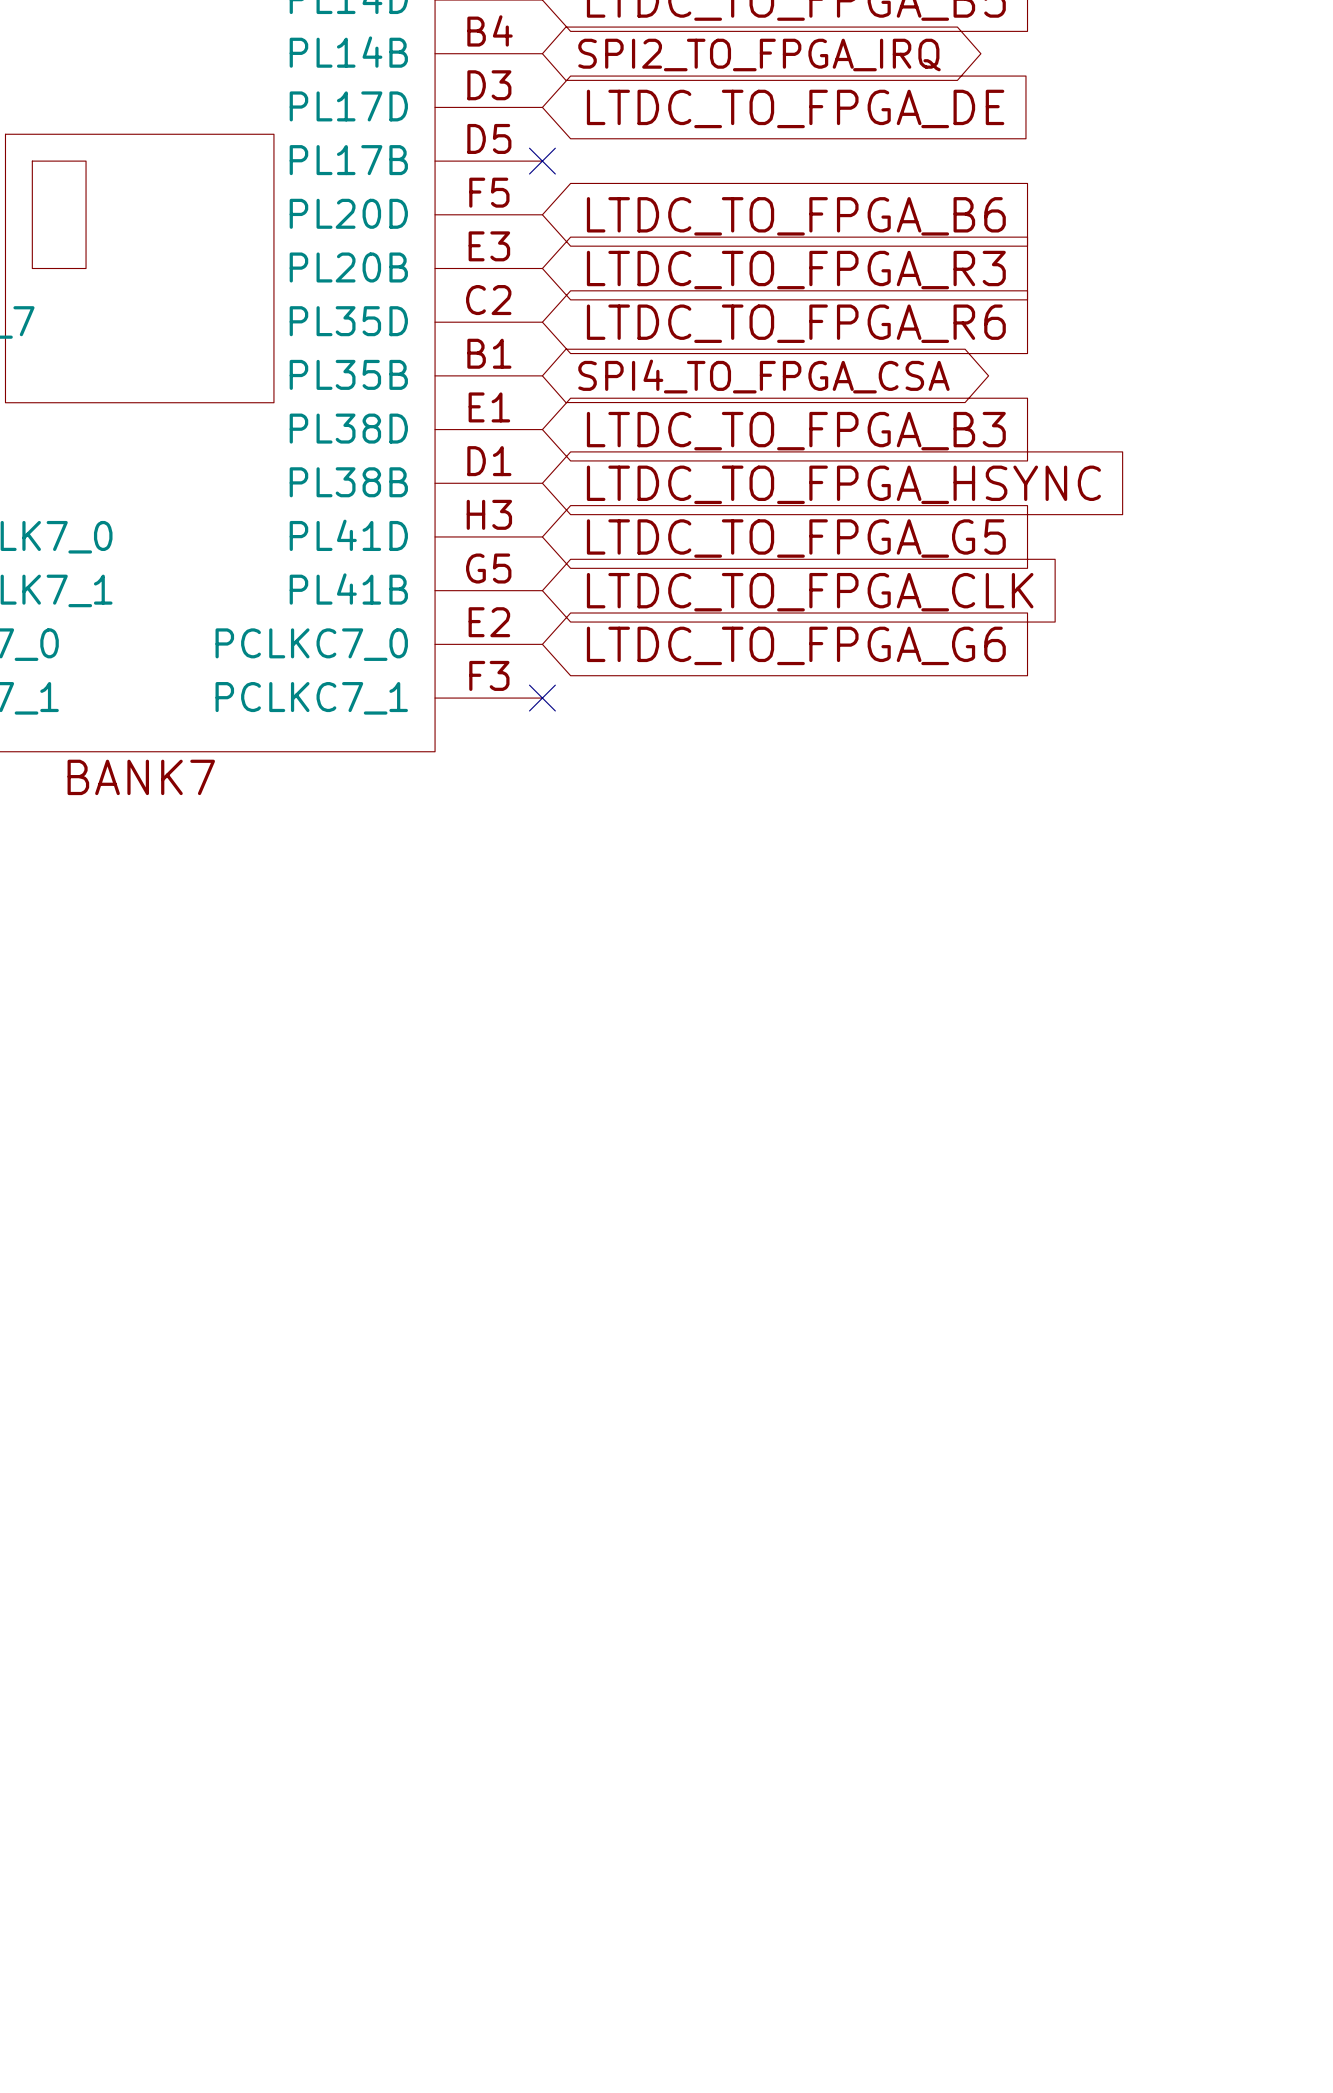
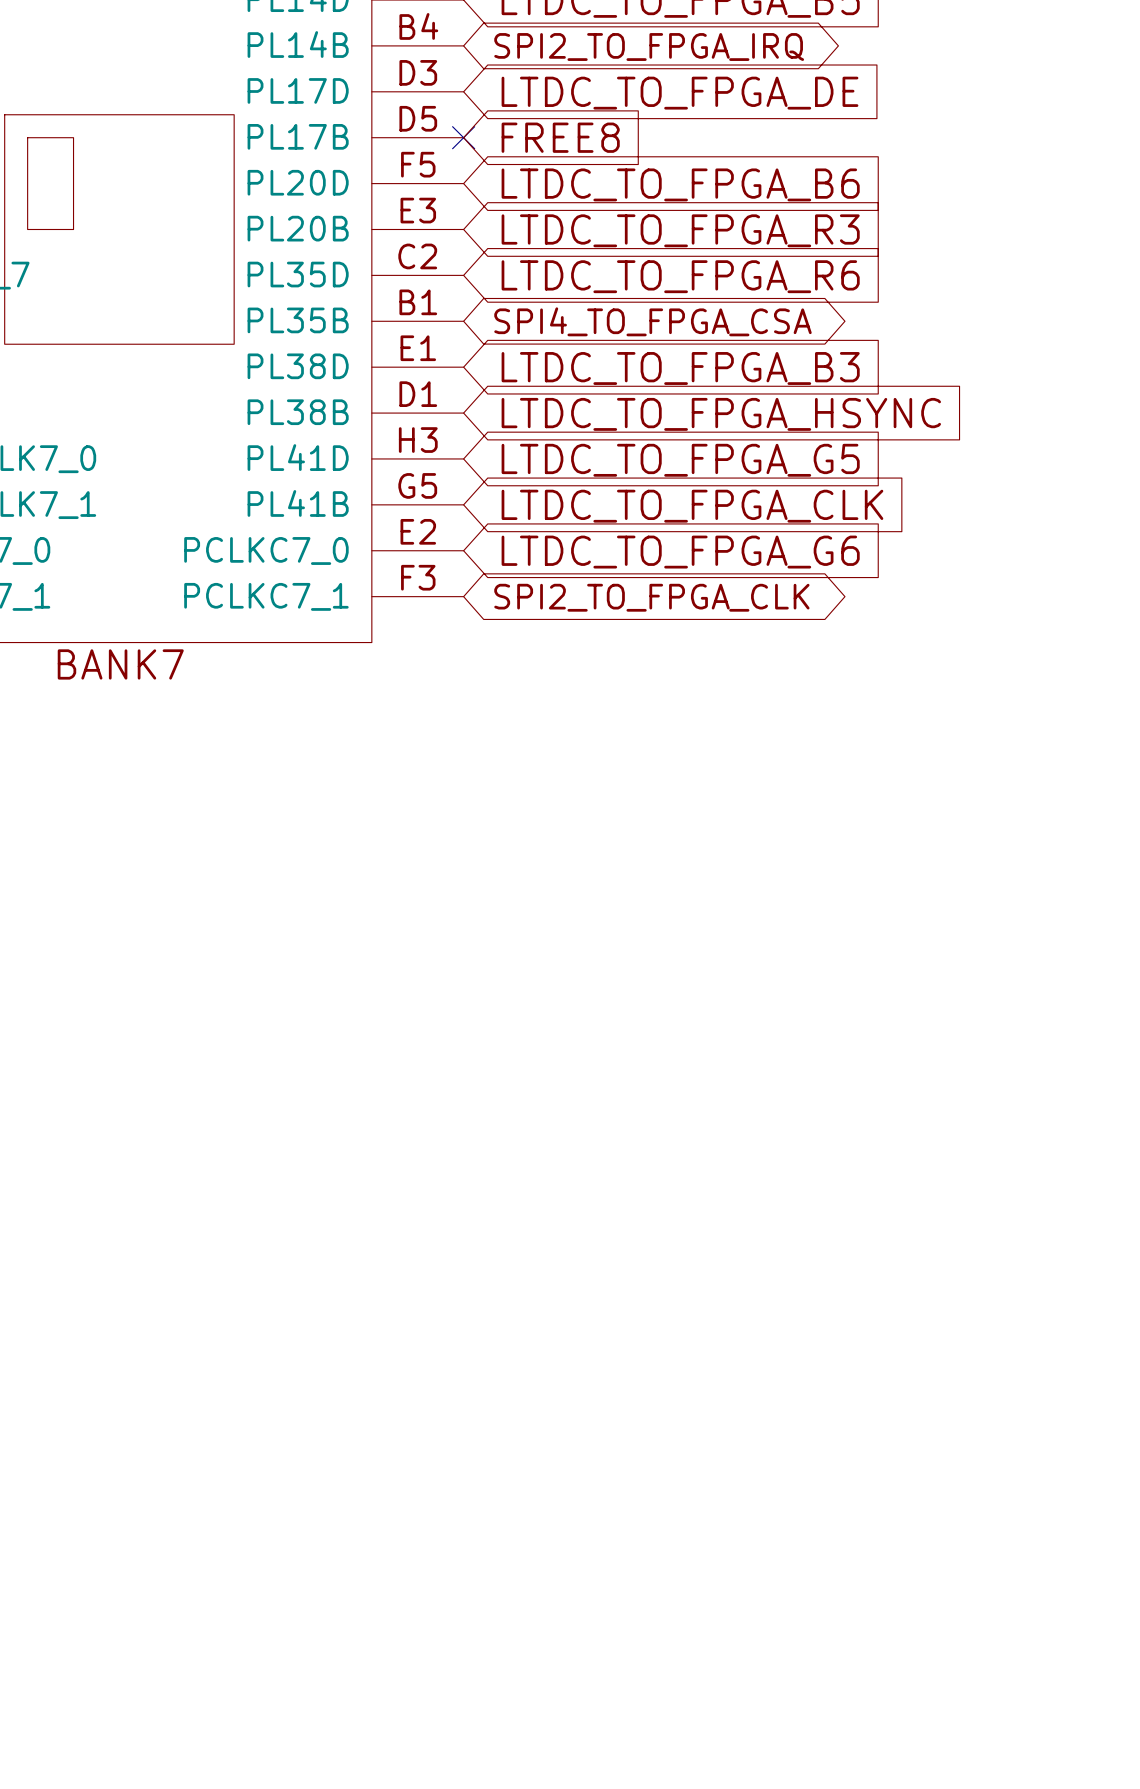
global label: none -> FREE8 (560, 137)
no-connect mark: (542, 698) -> none
global label: none -> SPI2_TO_FPGA_CLK (651, 597)

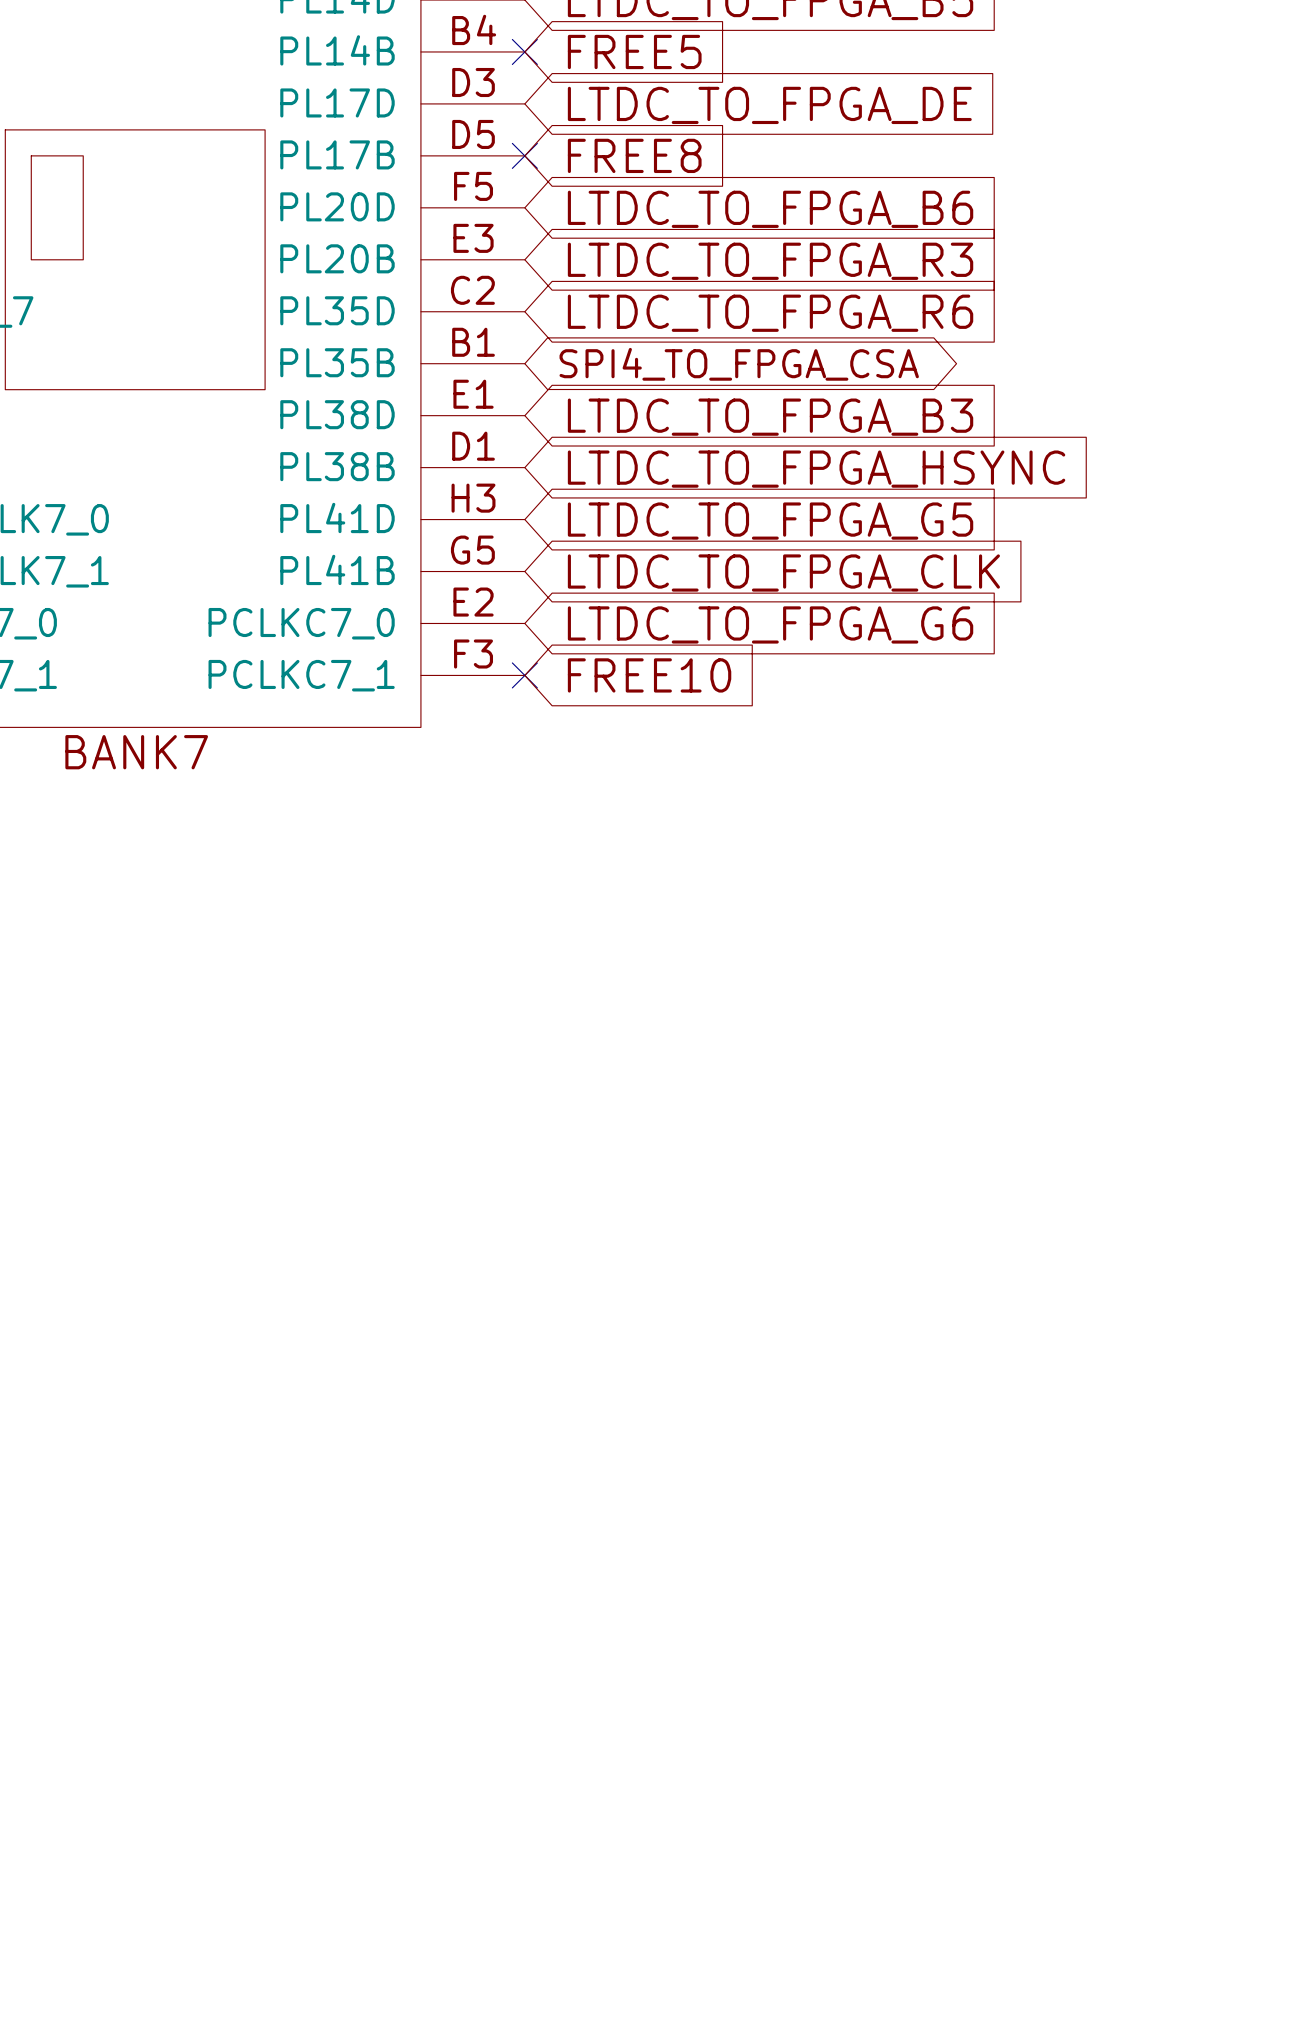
no-connect mark: none -> (524, 51)
global label shape: bidirectional (649, 47) -> input (634, 51)
global label: SPI2_TO_FPGA_IRQ (649, 47) -> FREE5 (634, 51)
no-connect mark: none -> (524, 675)
global label shape: bidirectional (651, 597) -> input (649, 675)
global label: SPI2_TO_FPGA_CLK (651, 597) -> FREE10 (649, 675)

